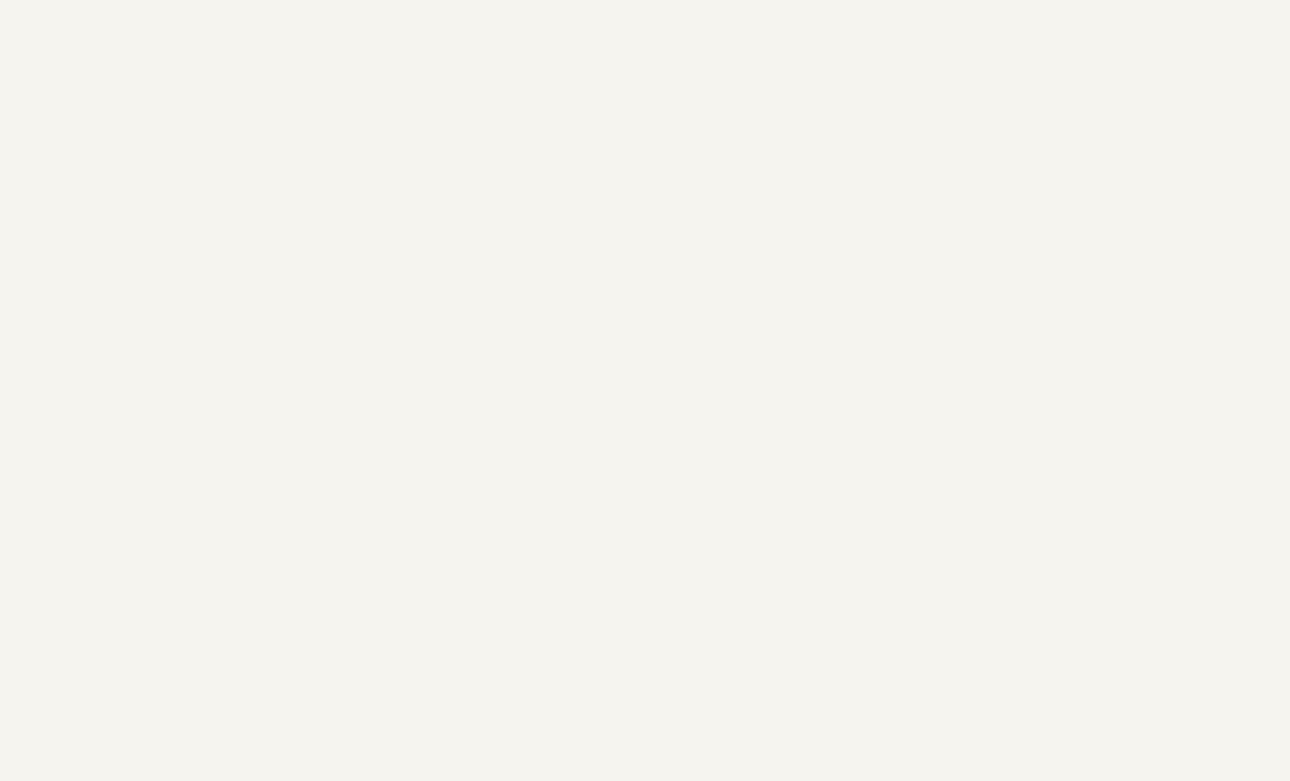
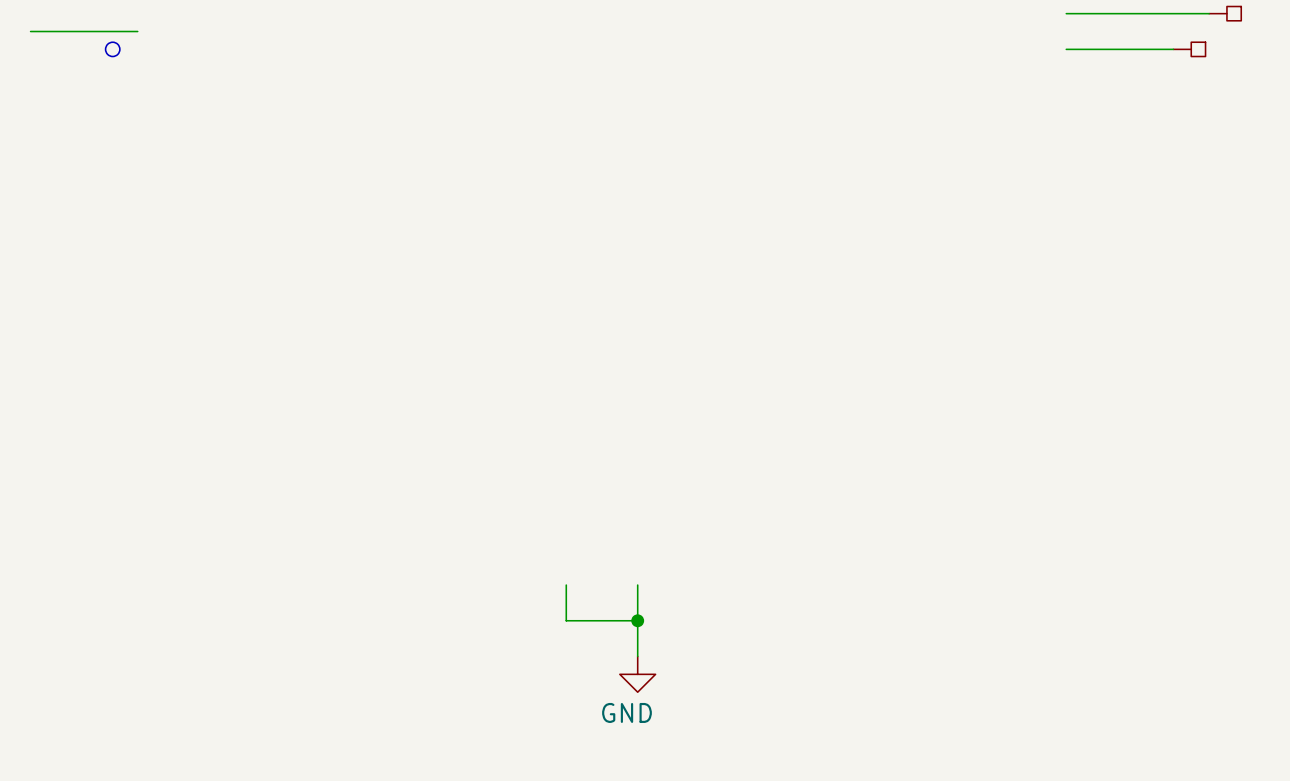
wire: none -> (1066, 13) (1209, 13)
part: none -> (1225, 13)
wire: none -> (30, 31) (137, 31)
drawing: none -> [105, 42, 120, 57]
wire: none -> (1066, 49) (1173, 49)
part: none -> (1189, 49)
wire: none -> (566, 585) (566, 620) (637, 620)
wire: none -> (637, 585) (637, 656)
junction: none -> (637, 620)
power symbol: none -> GND (637, 674)

